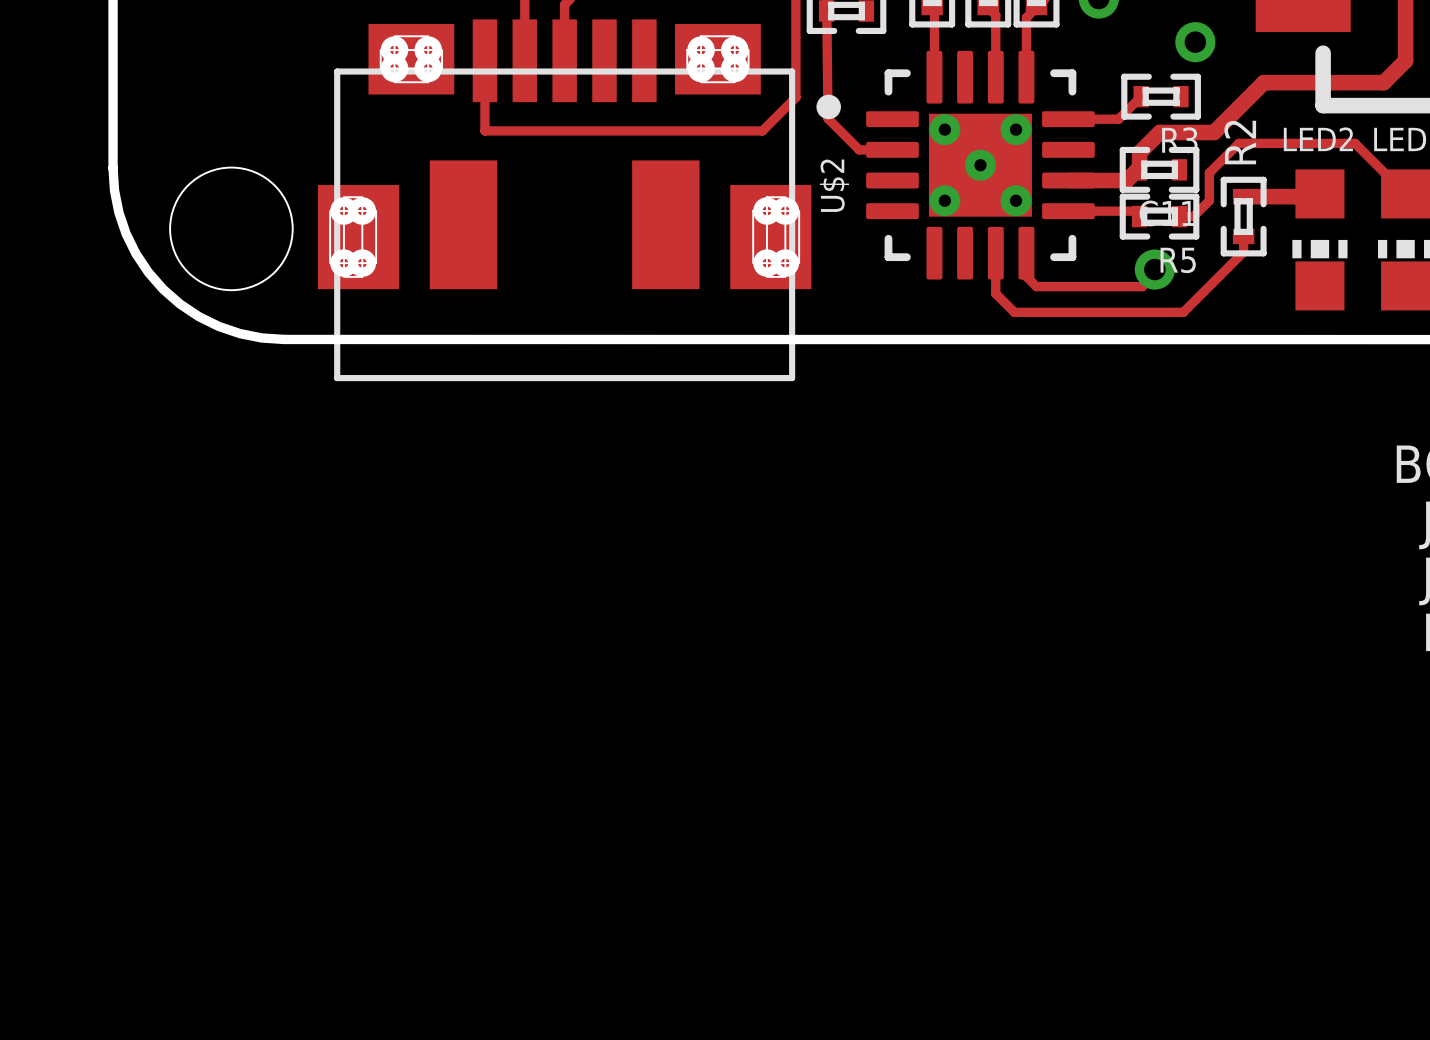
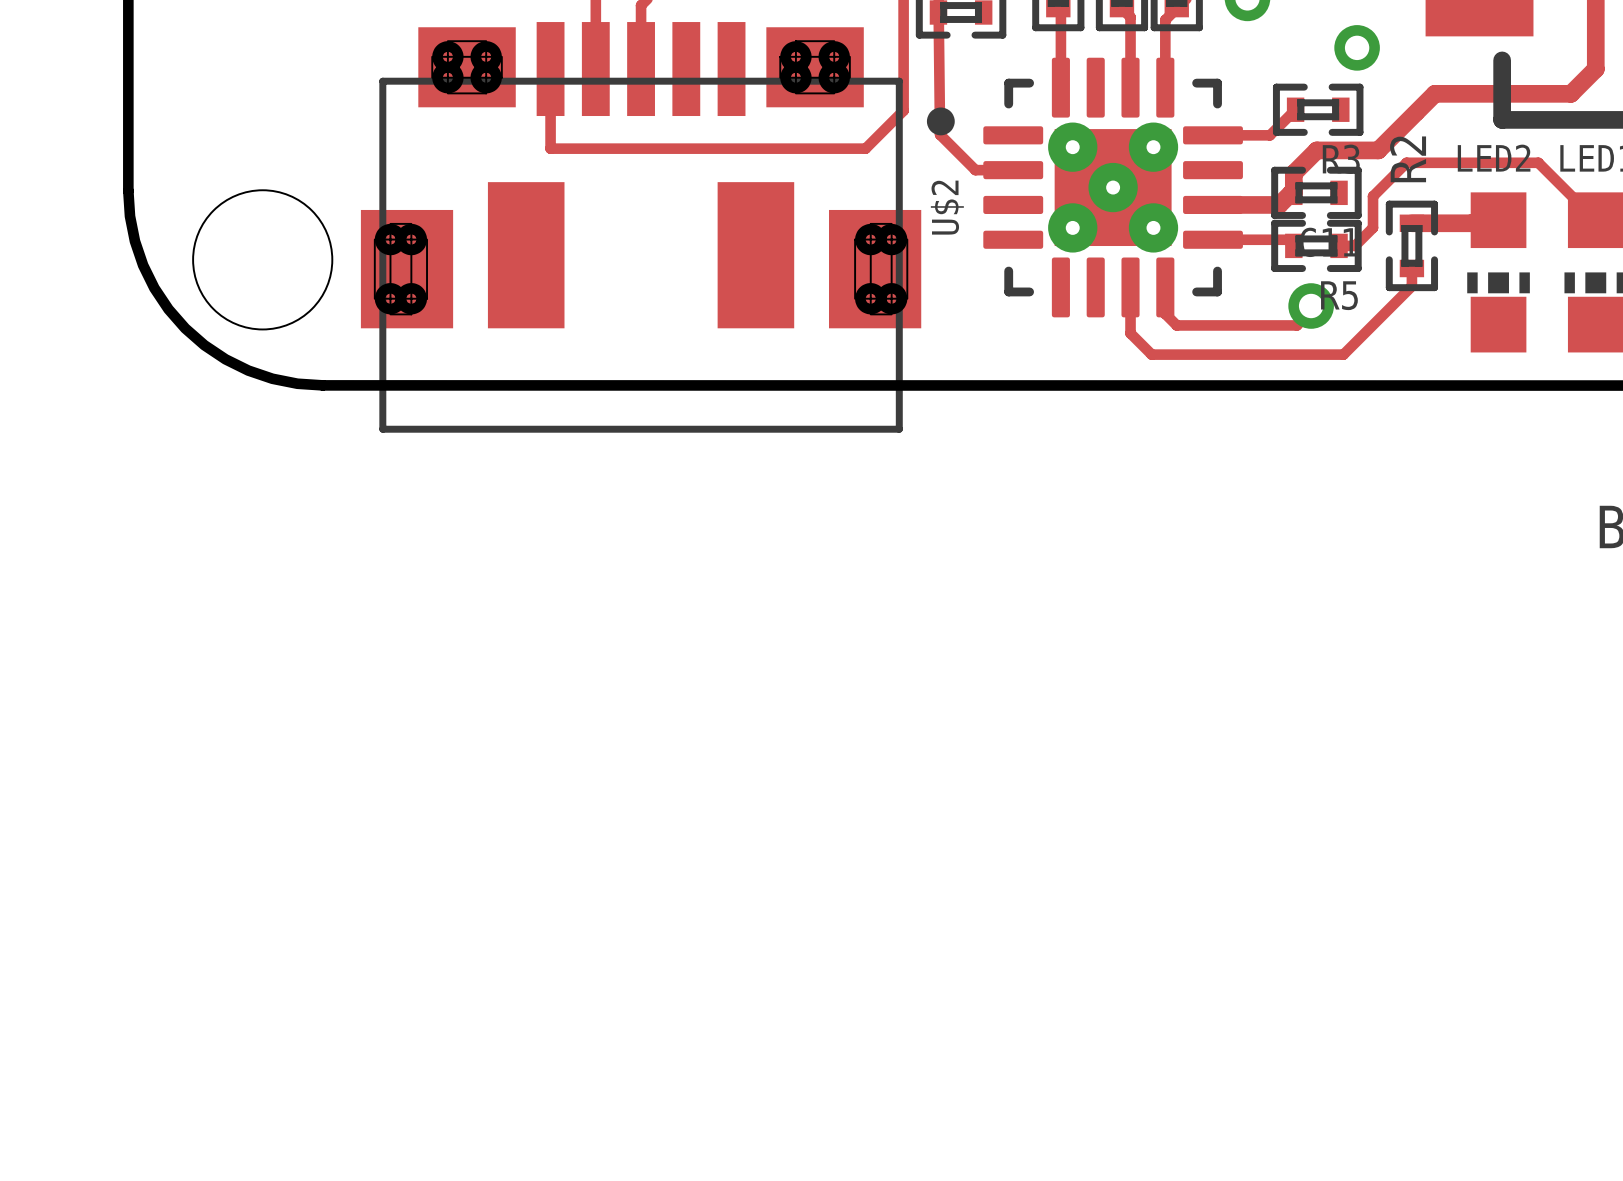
U$2 footprint: [816, 50, 1095, 280] -> [926, 57, 1243, 318]

